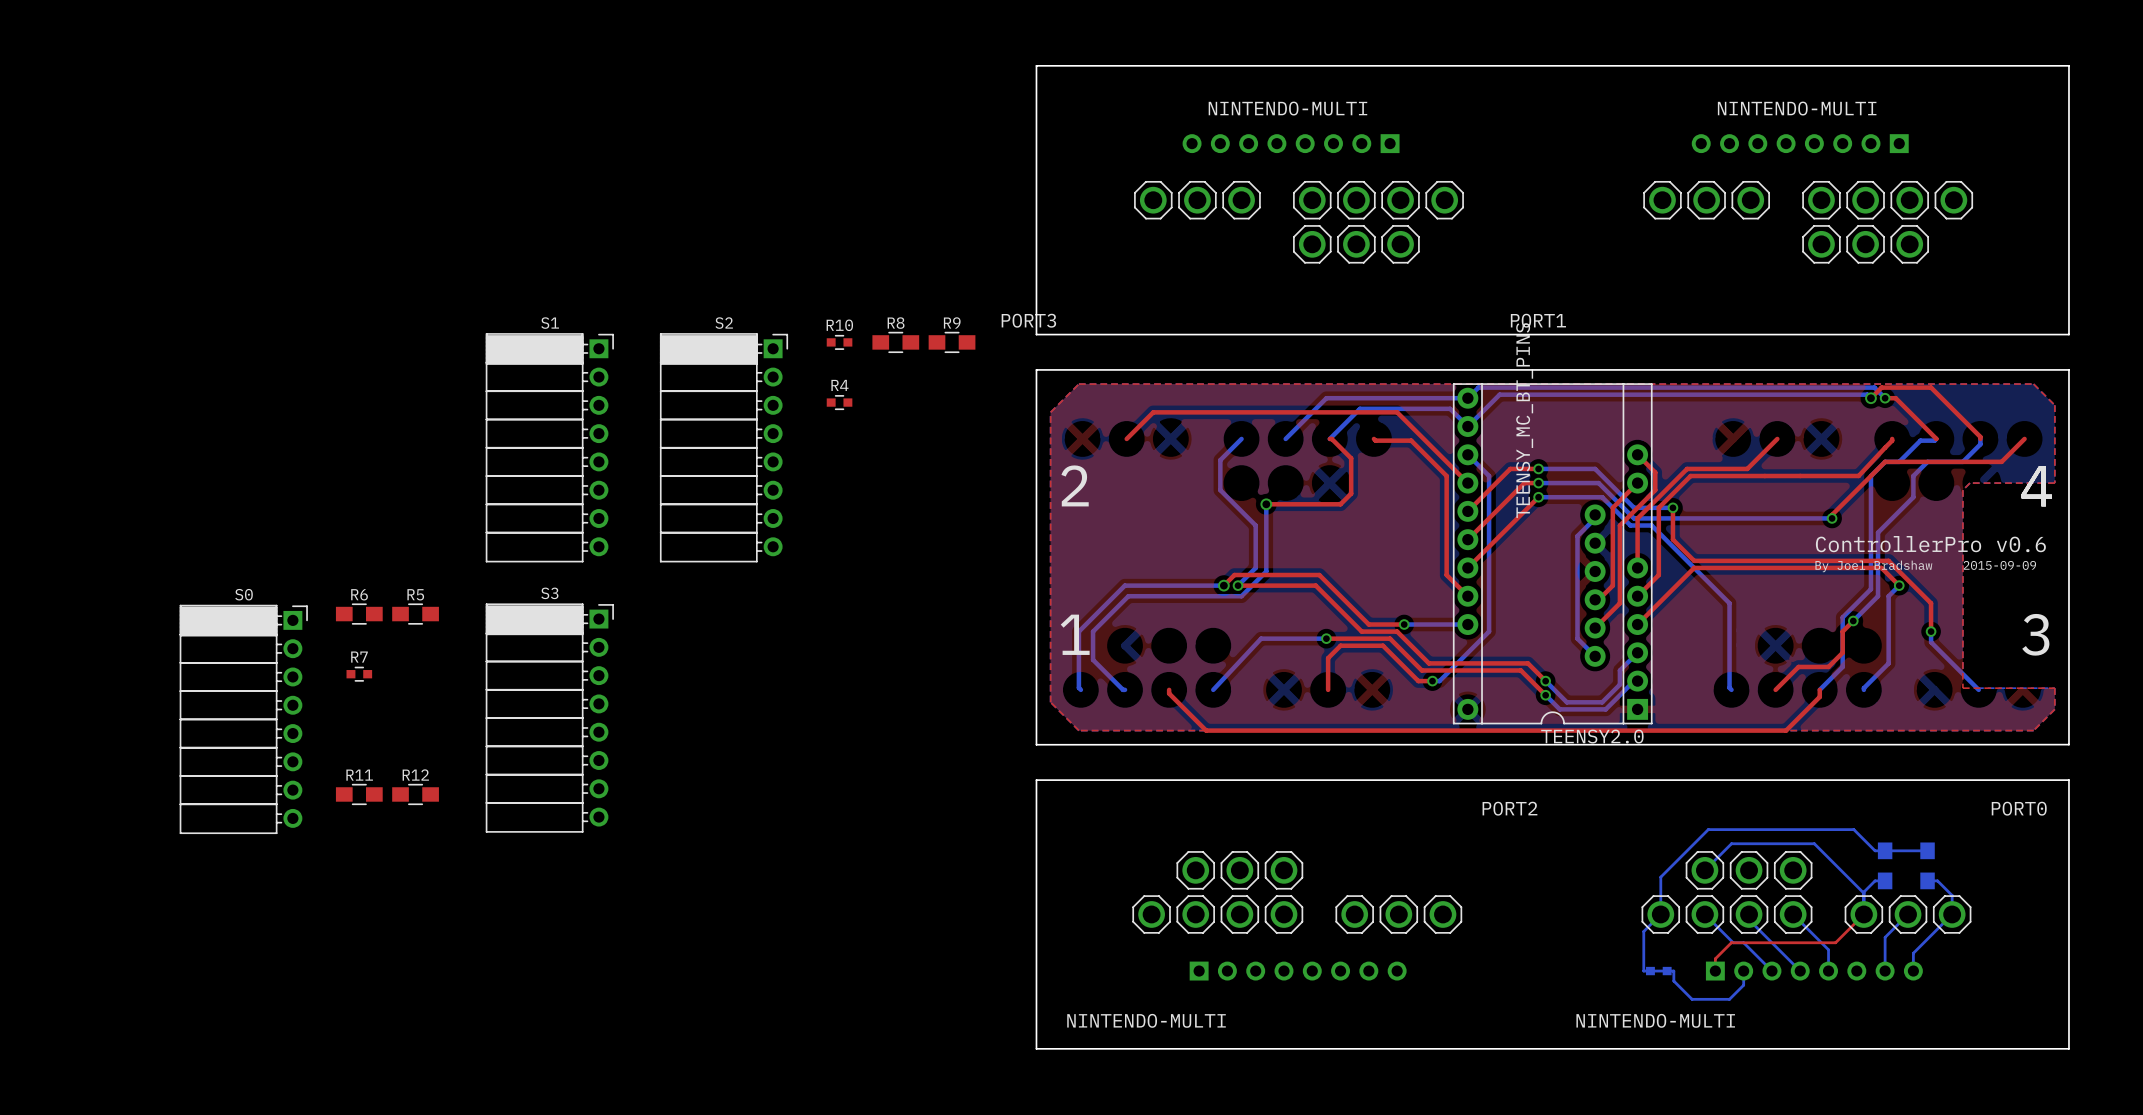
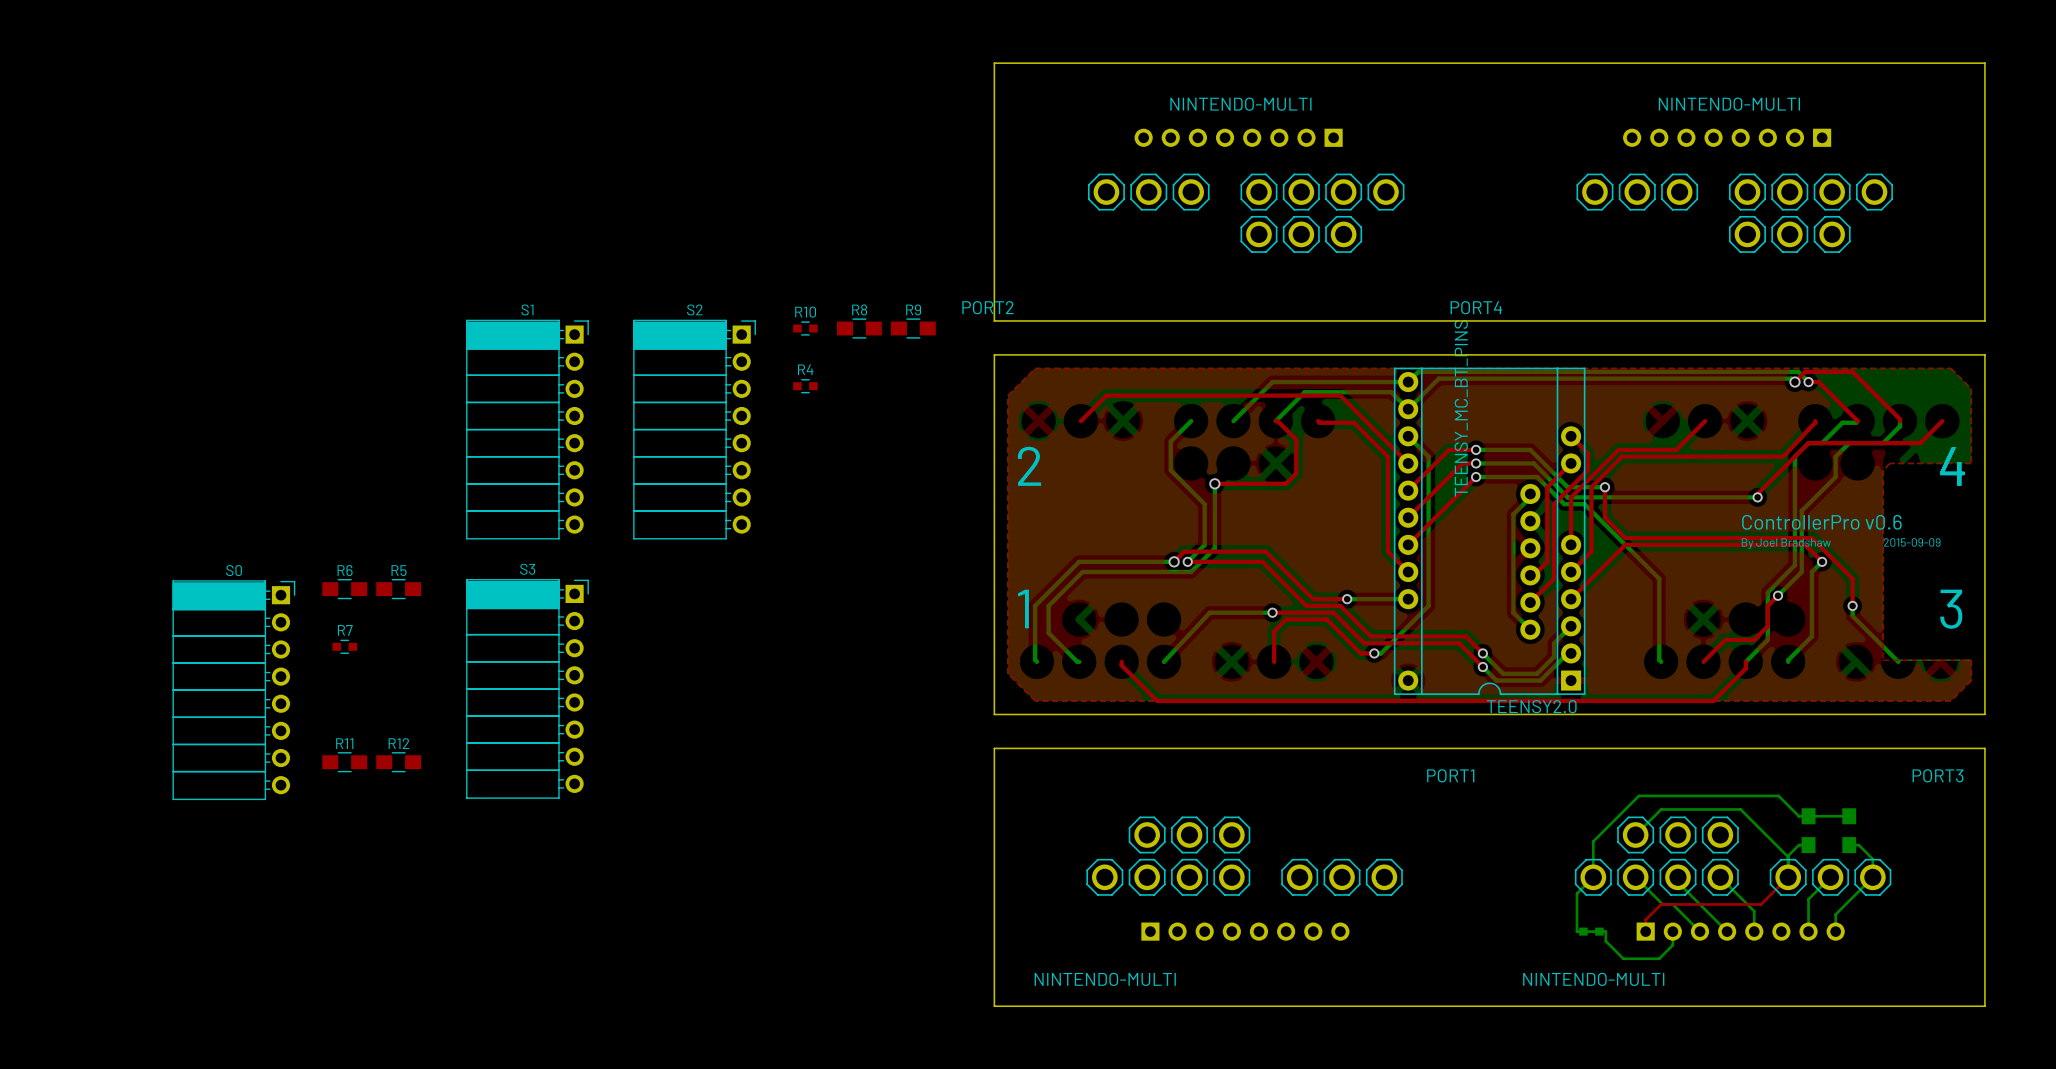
PORT3 name: PORT3 (1028, 320) -> PORT2 (988, 307)
PORT1 name: PORT1 (1538, 320) -> PORT4 (1476, 307)
PORT2 name: PORT2 (1509, 808) -> PORT1 (1450, 775)
PORT0 name: PORT0 (2019, 808) -> PORT3 (1937, 775)

